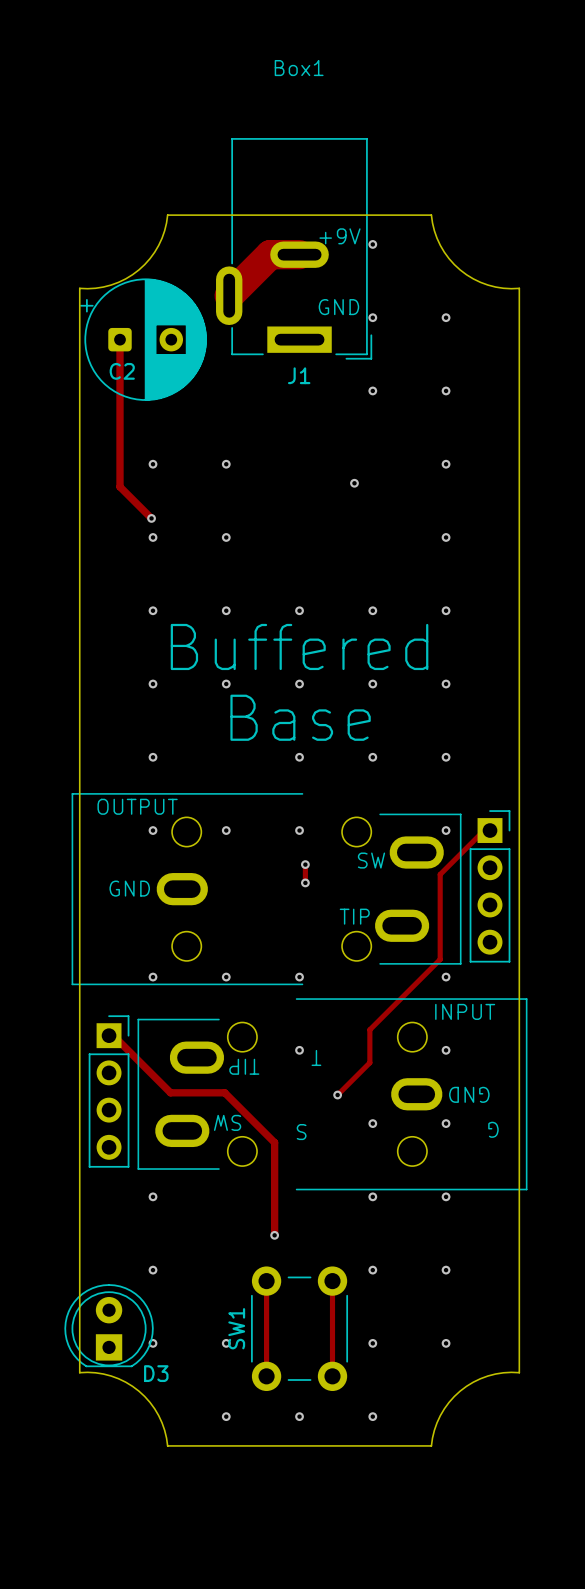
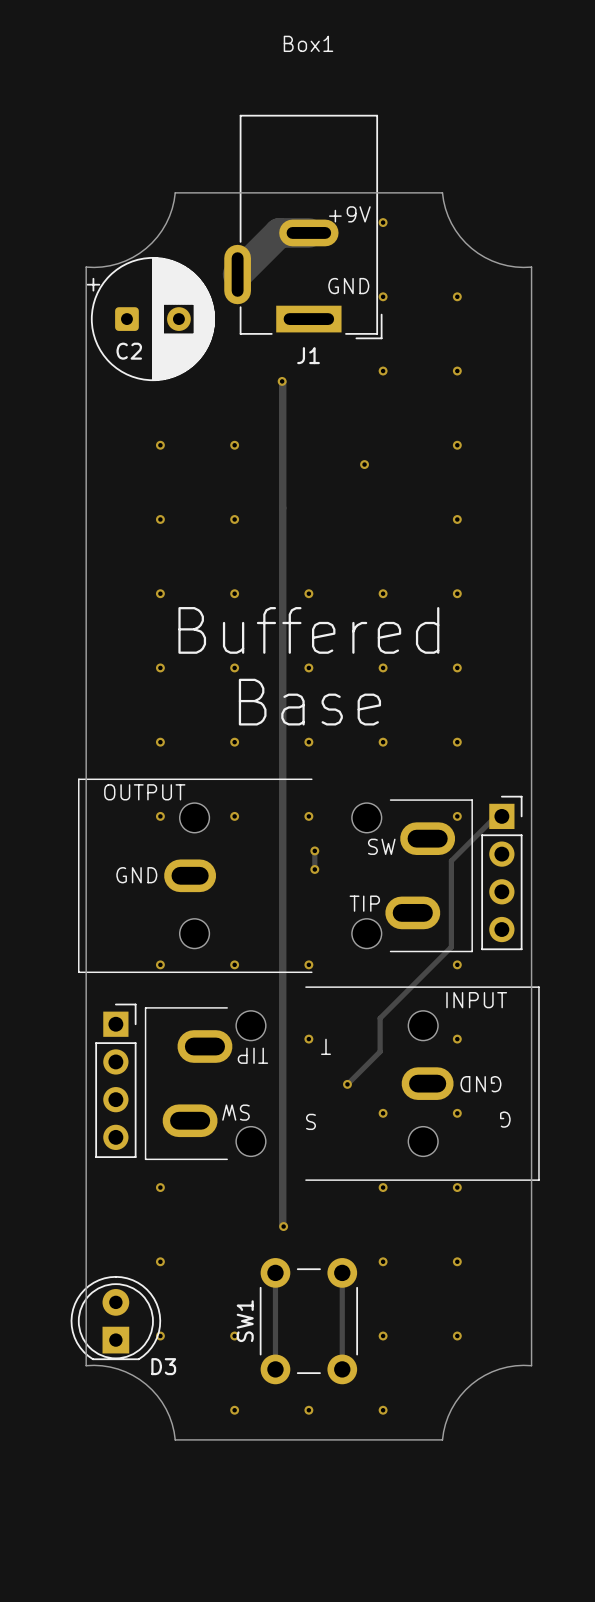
track: (120, 339) (120, 486) (151, 518) -> none
track: none -> (282, 381) (282, 1226)
via: none -> (282, 381)
via: (151, 518) -> none
via: none -> (234, 742)
track: (109, 1035) (113, 1035) (170, 1092) (224, 1092) (274, 1142) (274, 1235) -> none

